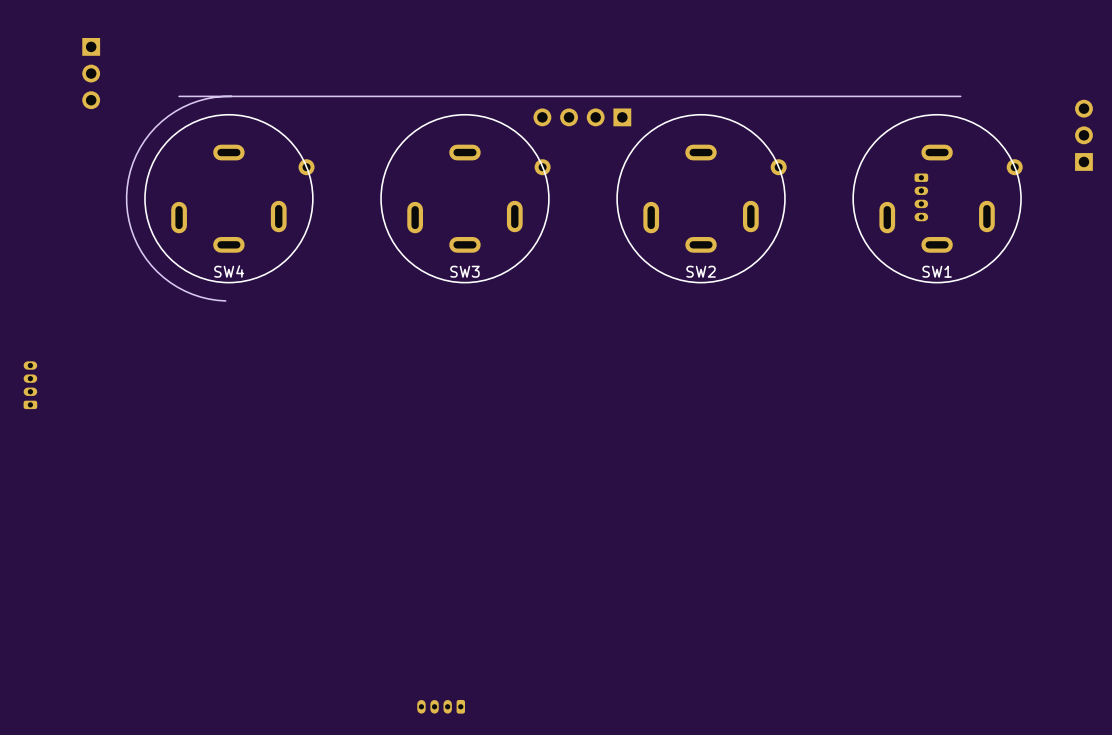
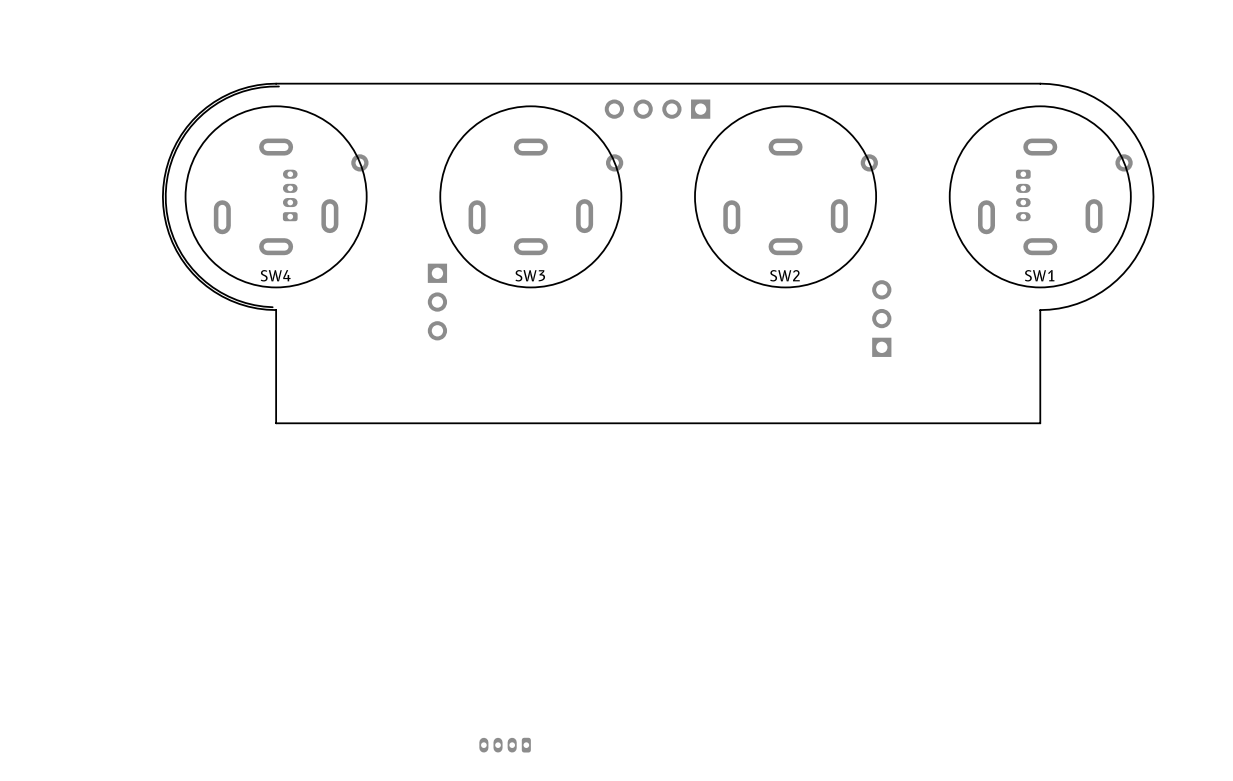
part: (91, 73) -> none
board edge: none -> (1040, 83) (276, 83) (257, 85) (230, 93) (214, 102) (192, 120) (181, 134) (172, 151) (166, 169) (163, 187) (164, 215) (169, 233) (176, 250) (186, 266) (199, 280) (214, 291) (230, 300) (248, 306) (276, 310) (276, 423) (1040, 423) (1040, 310) (1058, 308) (1077, 303) (1102, 291) (1116, 280) (1129, 266) (1143, 242) (1150, 224) (1153, 196) (1150, 169) (1143, 151) (1135, 134) (1116, 113) (1102, 102) (1085, 93) (1058, 85) (1040, 83)
board edge: (960, 96) (179, 96) -> none
part: (1083, 135) -> none
part: none -> (290, 195)
part: none -> (437, 302)
part: none -> (881, 318)
part: (30, 385) -> none

